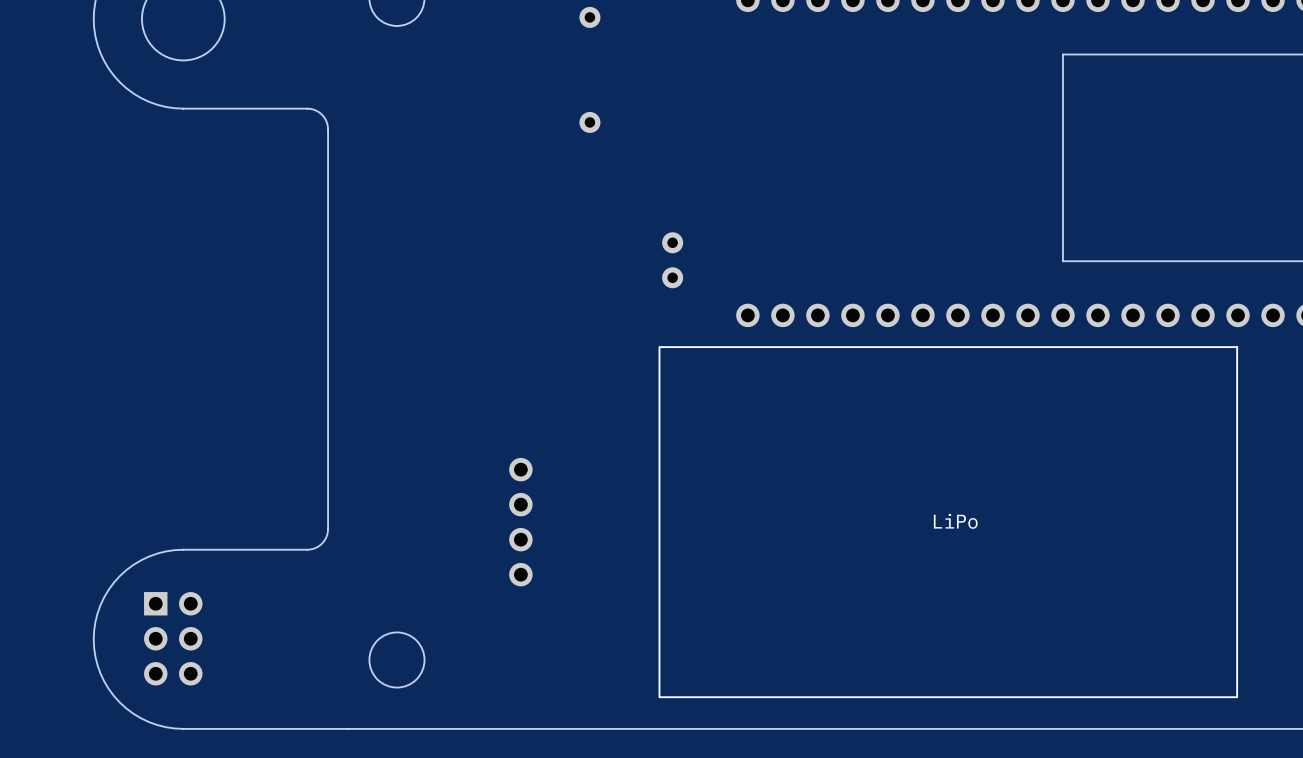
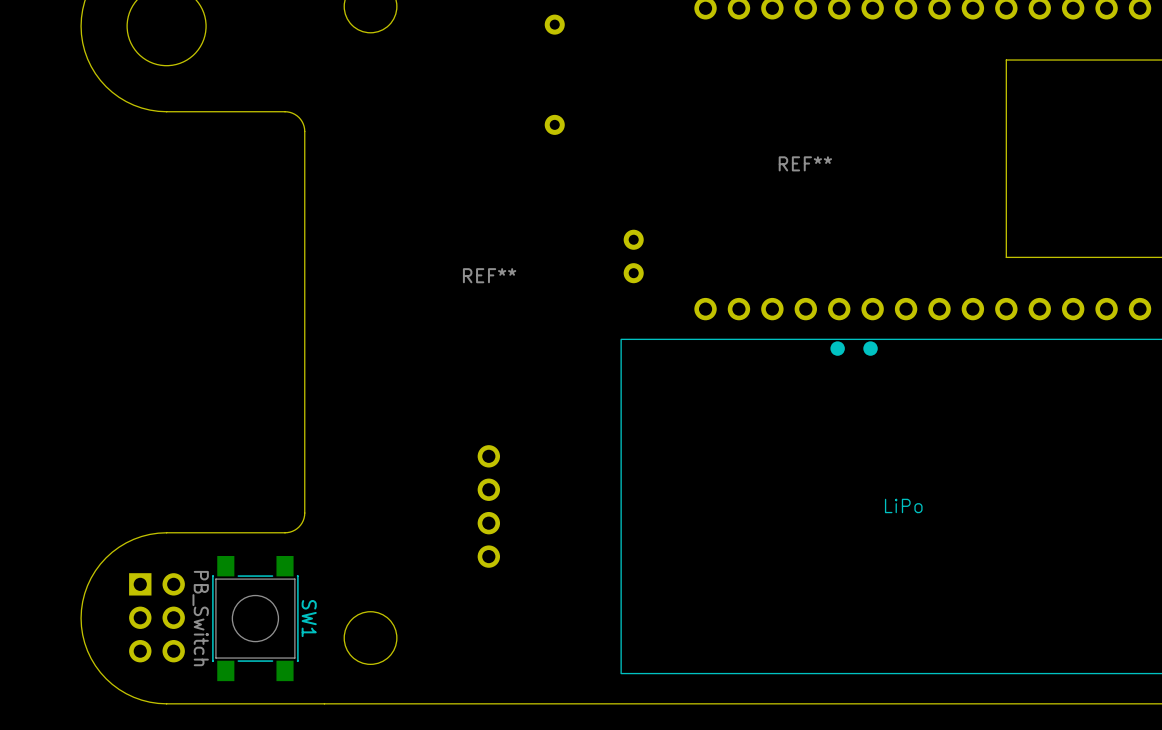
REF**: none -> (805, 163)
REF**: none -> (489, 275)
drawing: none -> [830, 341, 845, 356]
drawing: none -> [863, 341, 878, 356]
SW1: none -> PB_Switch (255, 618)

